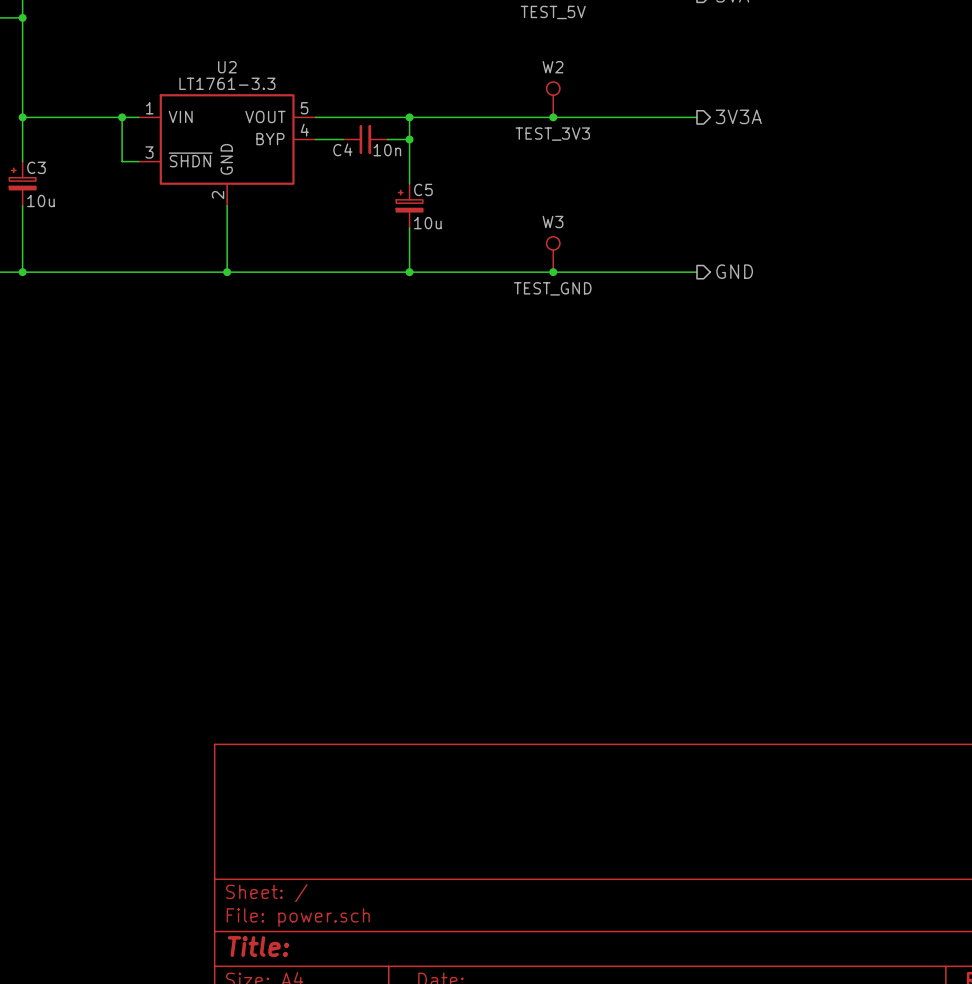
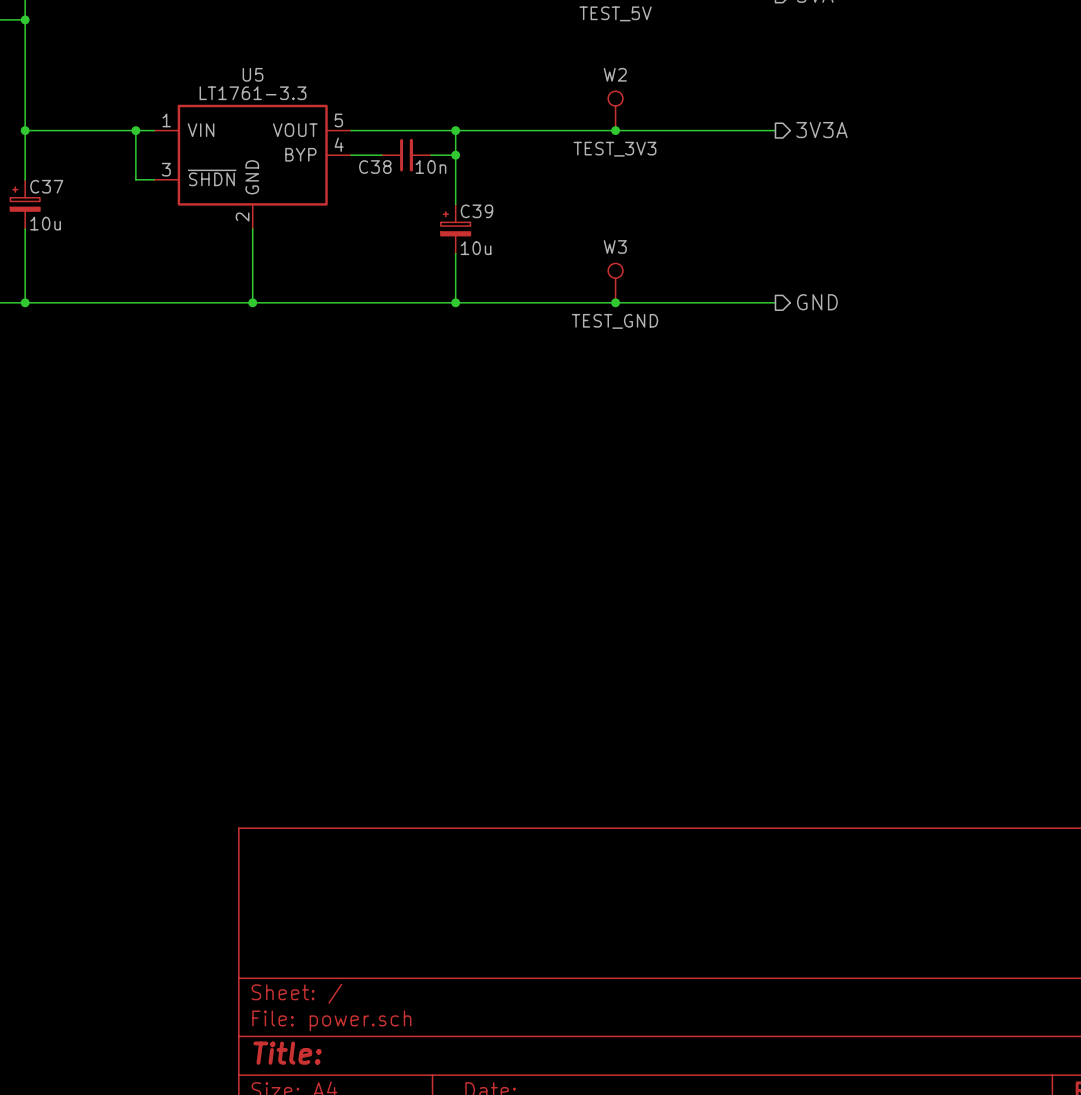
U2 name: U2 (227, 67) -> U5 (253, 74)
C4 name: C4 (342, 149) -> C38 (375, 167)
C3 name: C3 (36, 167) -> C37 (46, 186)
C5 name: C5 (423, 189) -> C39 (476, 211)

